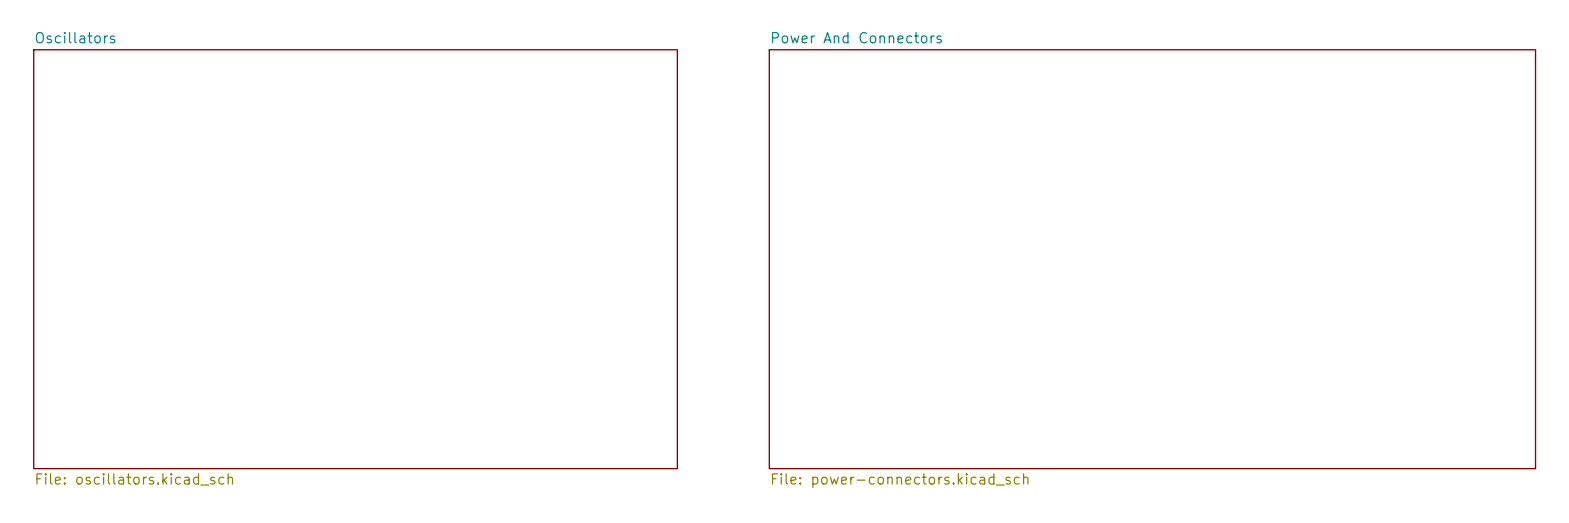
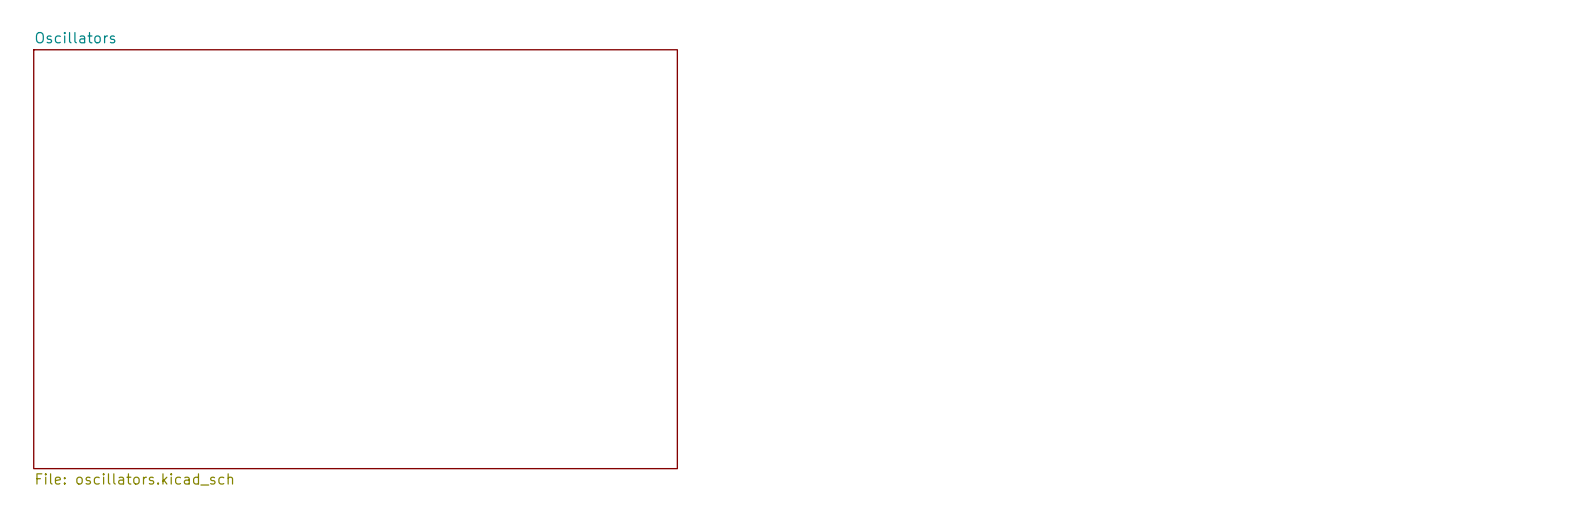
sheet Power And Connectors: File: power-connectors.kicad_sch (1152, 259) -> none

